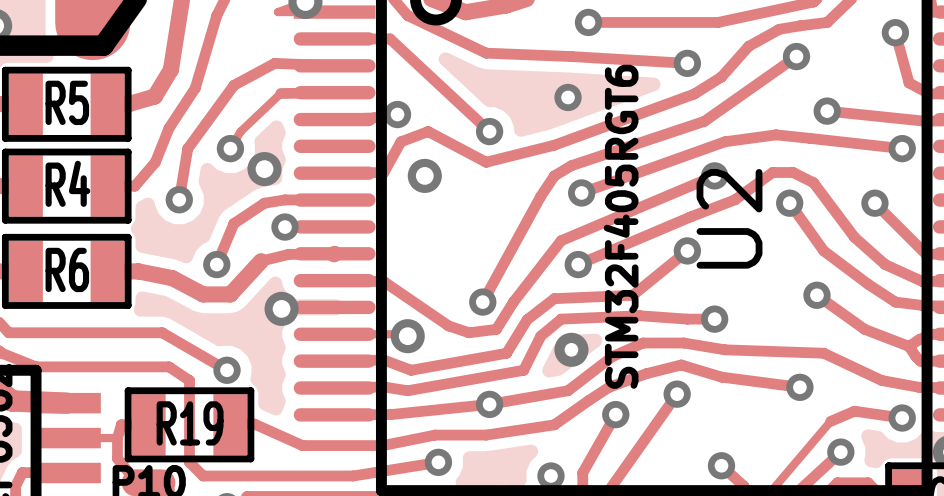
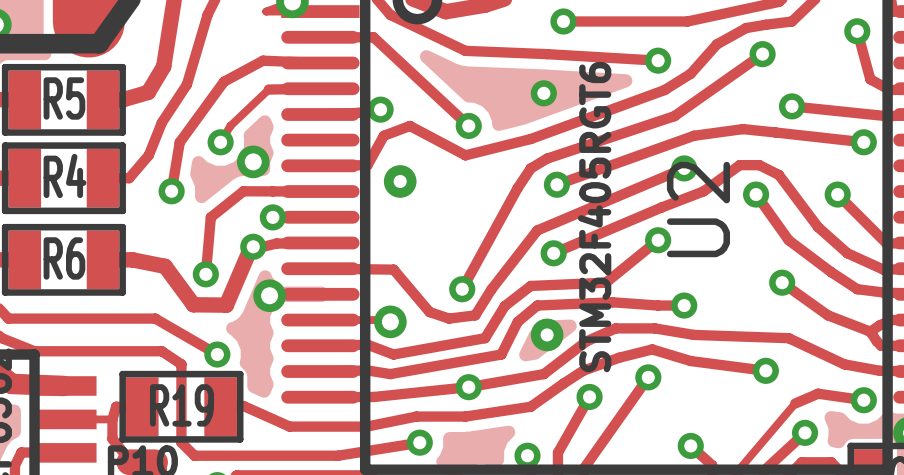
via position: (424, 175) -> (400, 181)
track: (284, 199) (264, 203) (233, 223) (216, 264) -> (272, 191) (243, 191) (210, 217) (205, 274)
via: none -> (253, 246)
track: (261, 261) (230, 294) (203, 294) (172, 278) -> (250, 250) (226, 305) (193, 304) (165, 266)
via position: (216, 264) -> (205, 274)
track: (334, 280) (383, 281) (448, 325) -> (320, 268) (393, 269) (429, 312)

